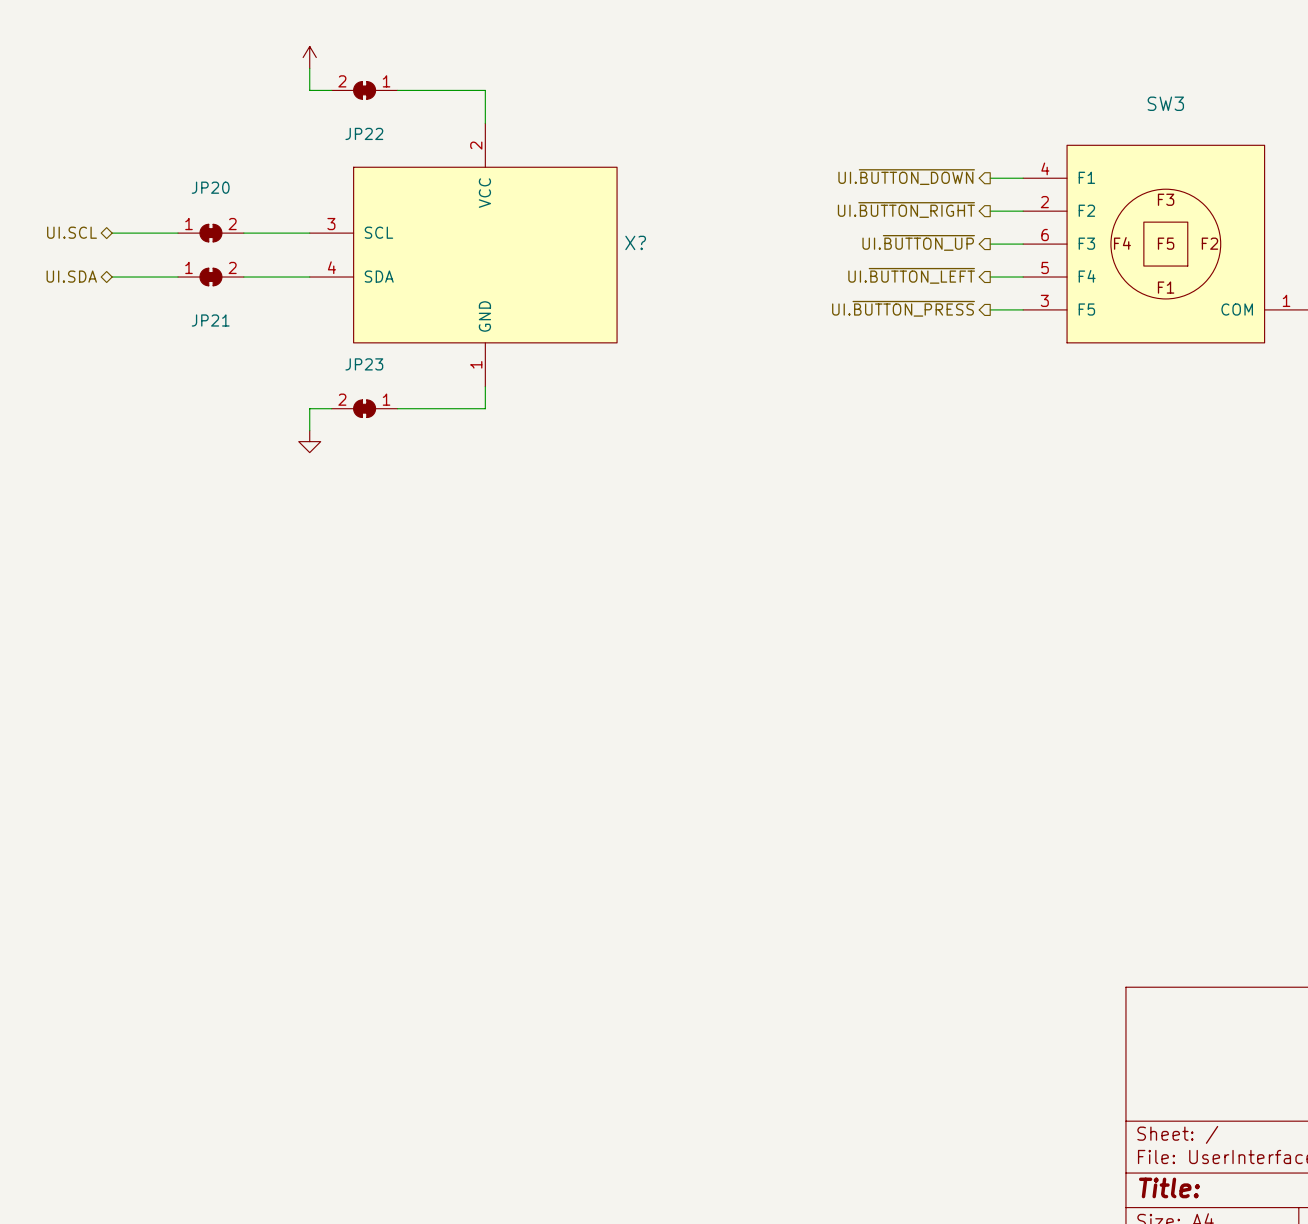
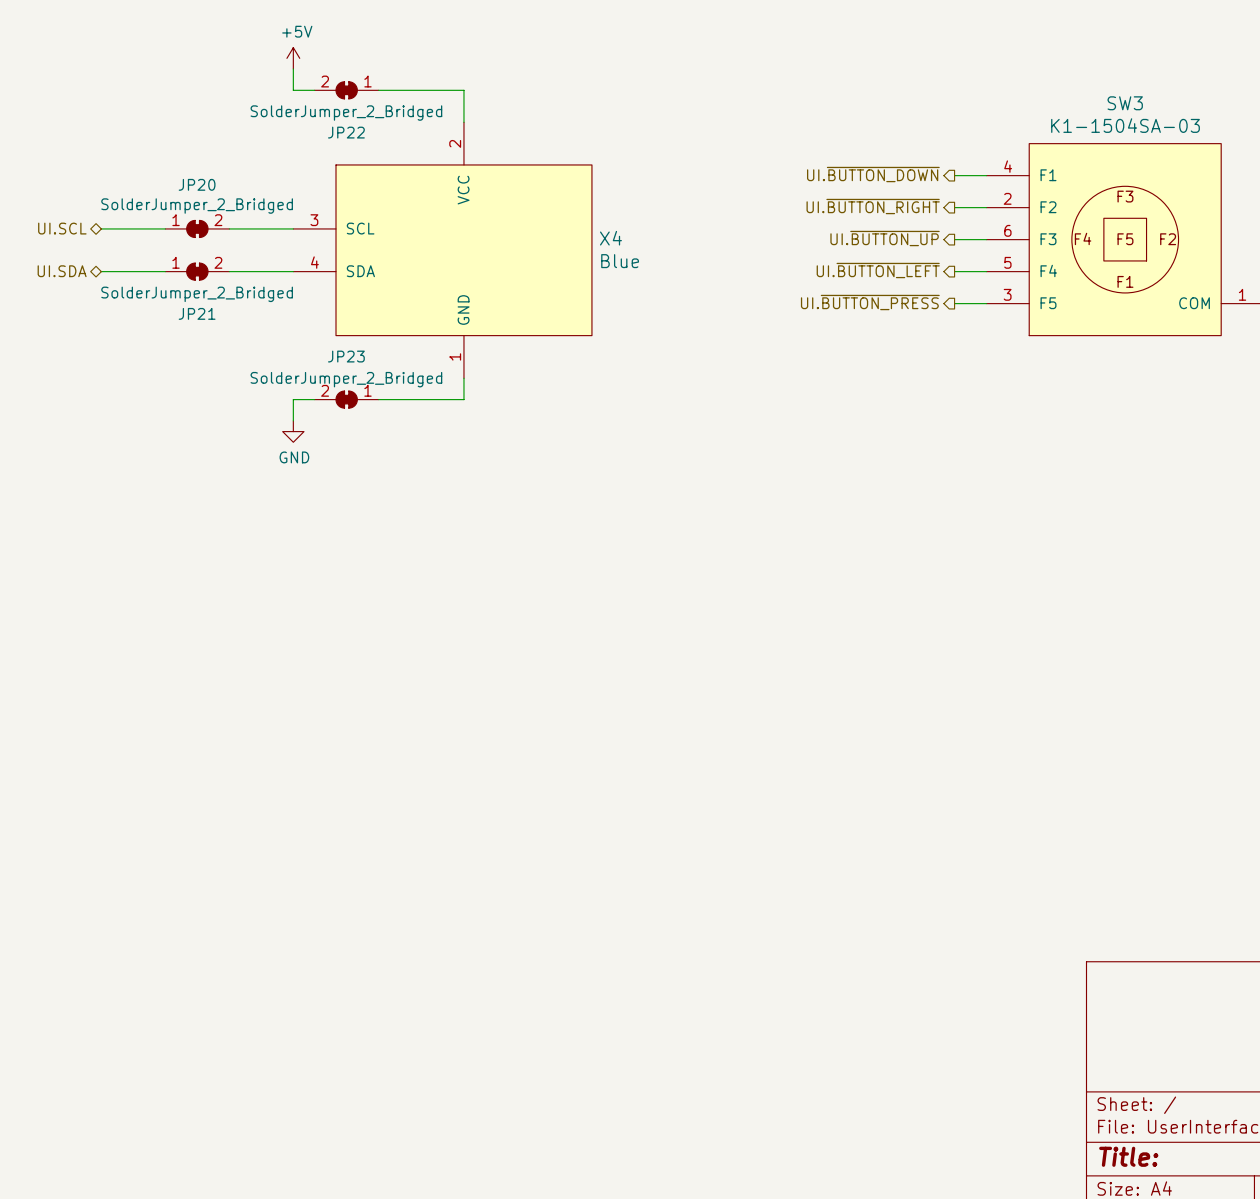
power symbol text: none -> +5V (297, 31)
JP22 value: none -> SolderJumper_2_Bridged (346, 113)
SW3 value: none -> K1-1504SA-03 (1125, 125)
JP20 value: none -> SolderJumper_2_Bridged (197, 206)
X? name: X? (635, 242) -> X4 (610, 238)
X? value: none -> Blue (620, 261)
JP21 value: none -> SolderJumper_2_Bridged (197, 294)
JP23 value: none -> SolderJumper_2_Bridged (346, 379)
power symbol text: none -> GND (294, 457)

